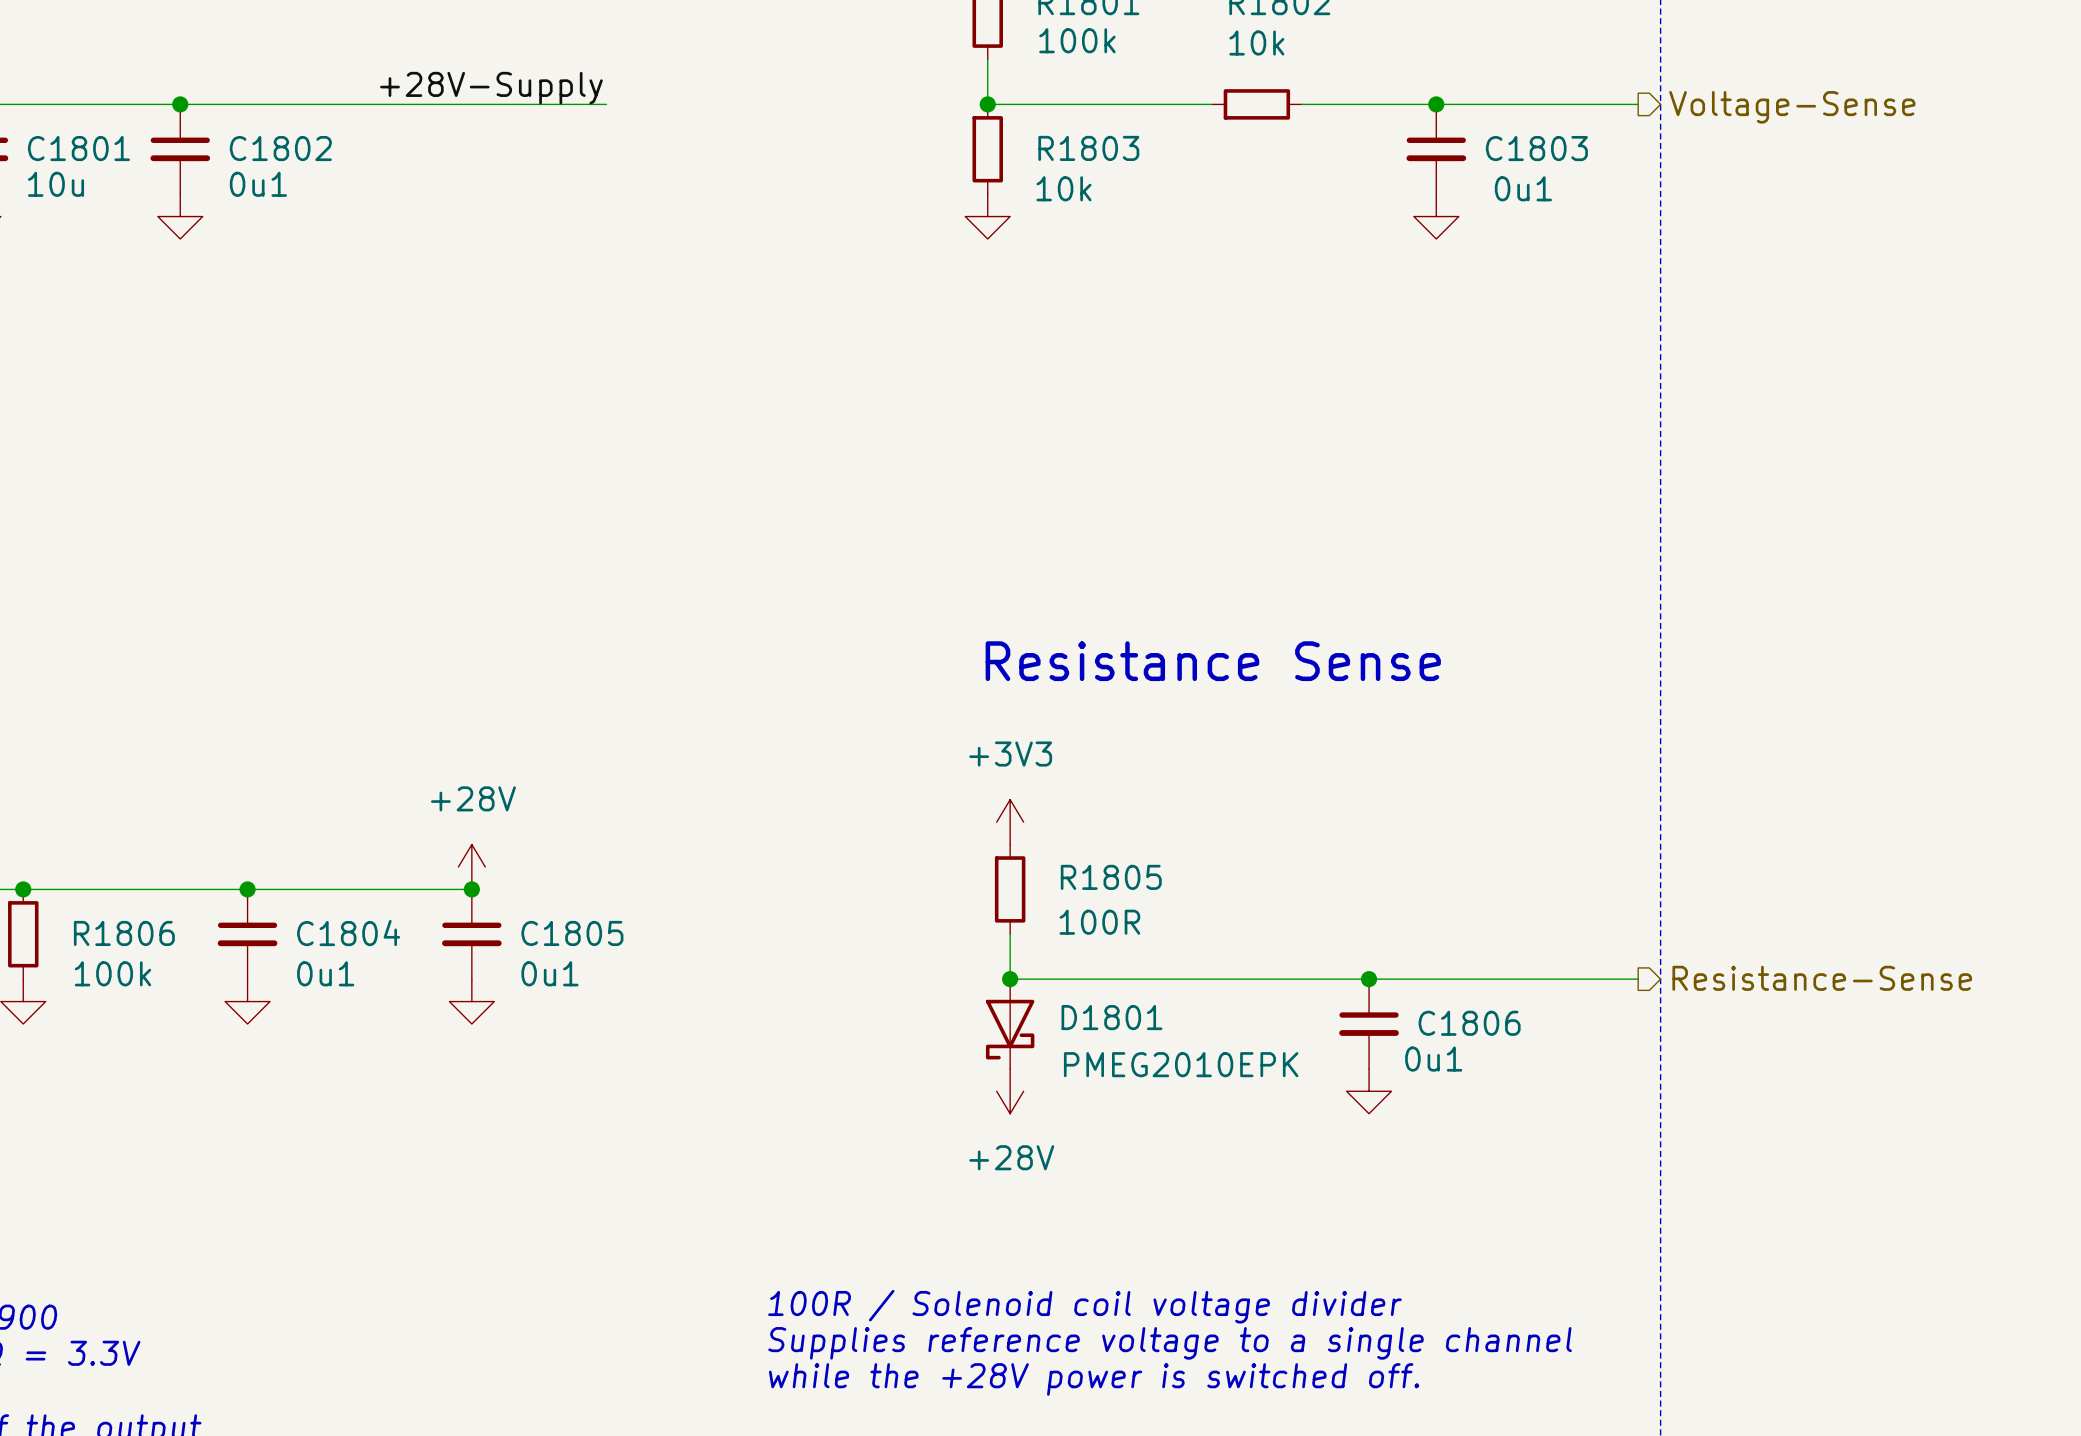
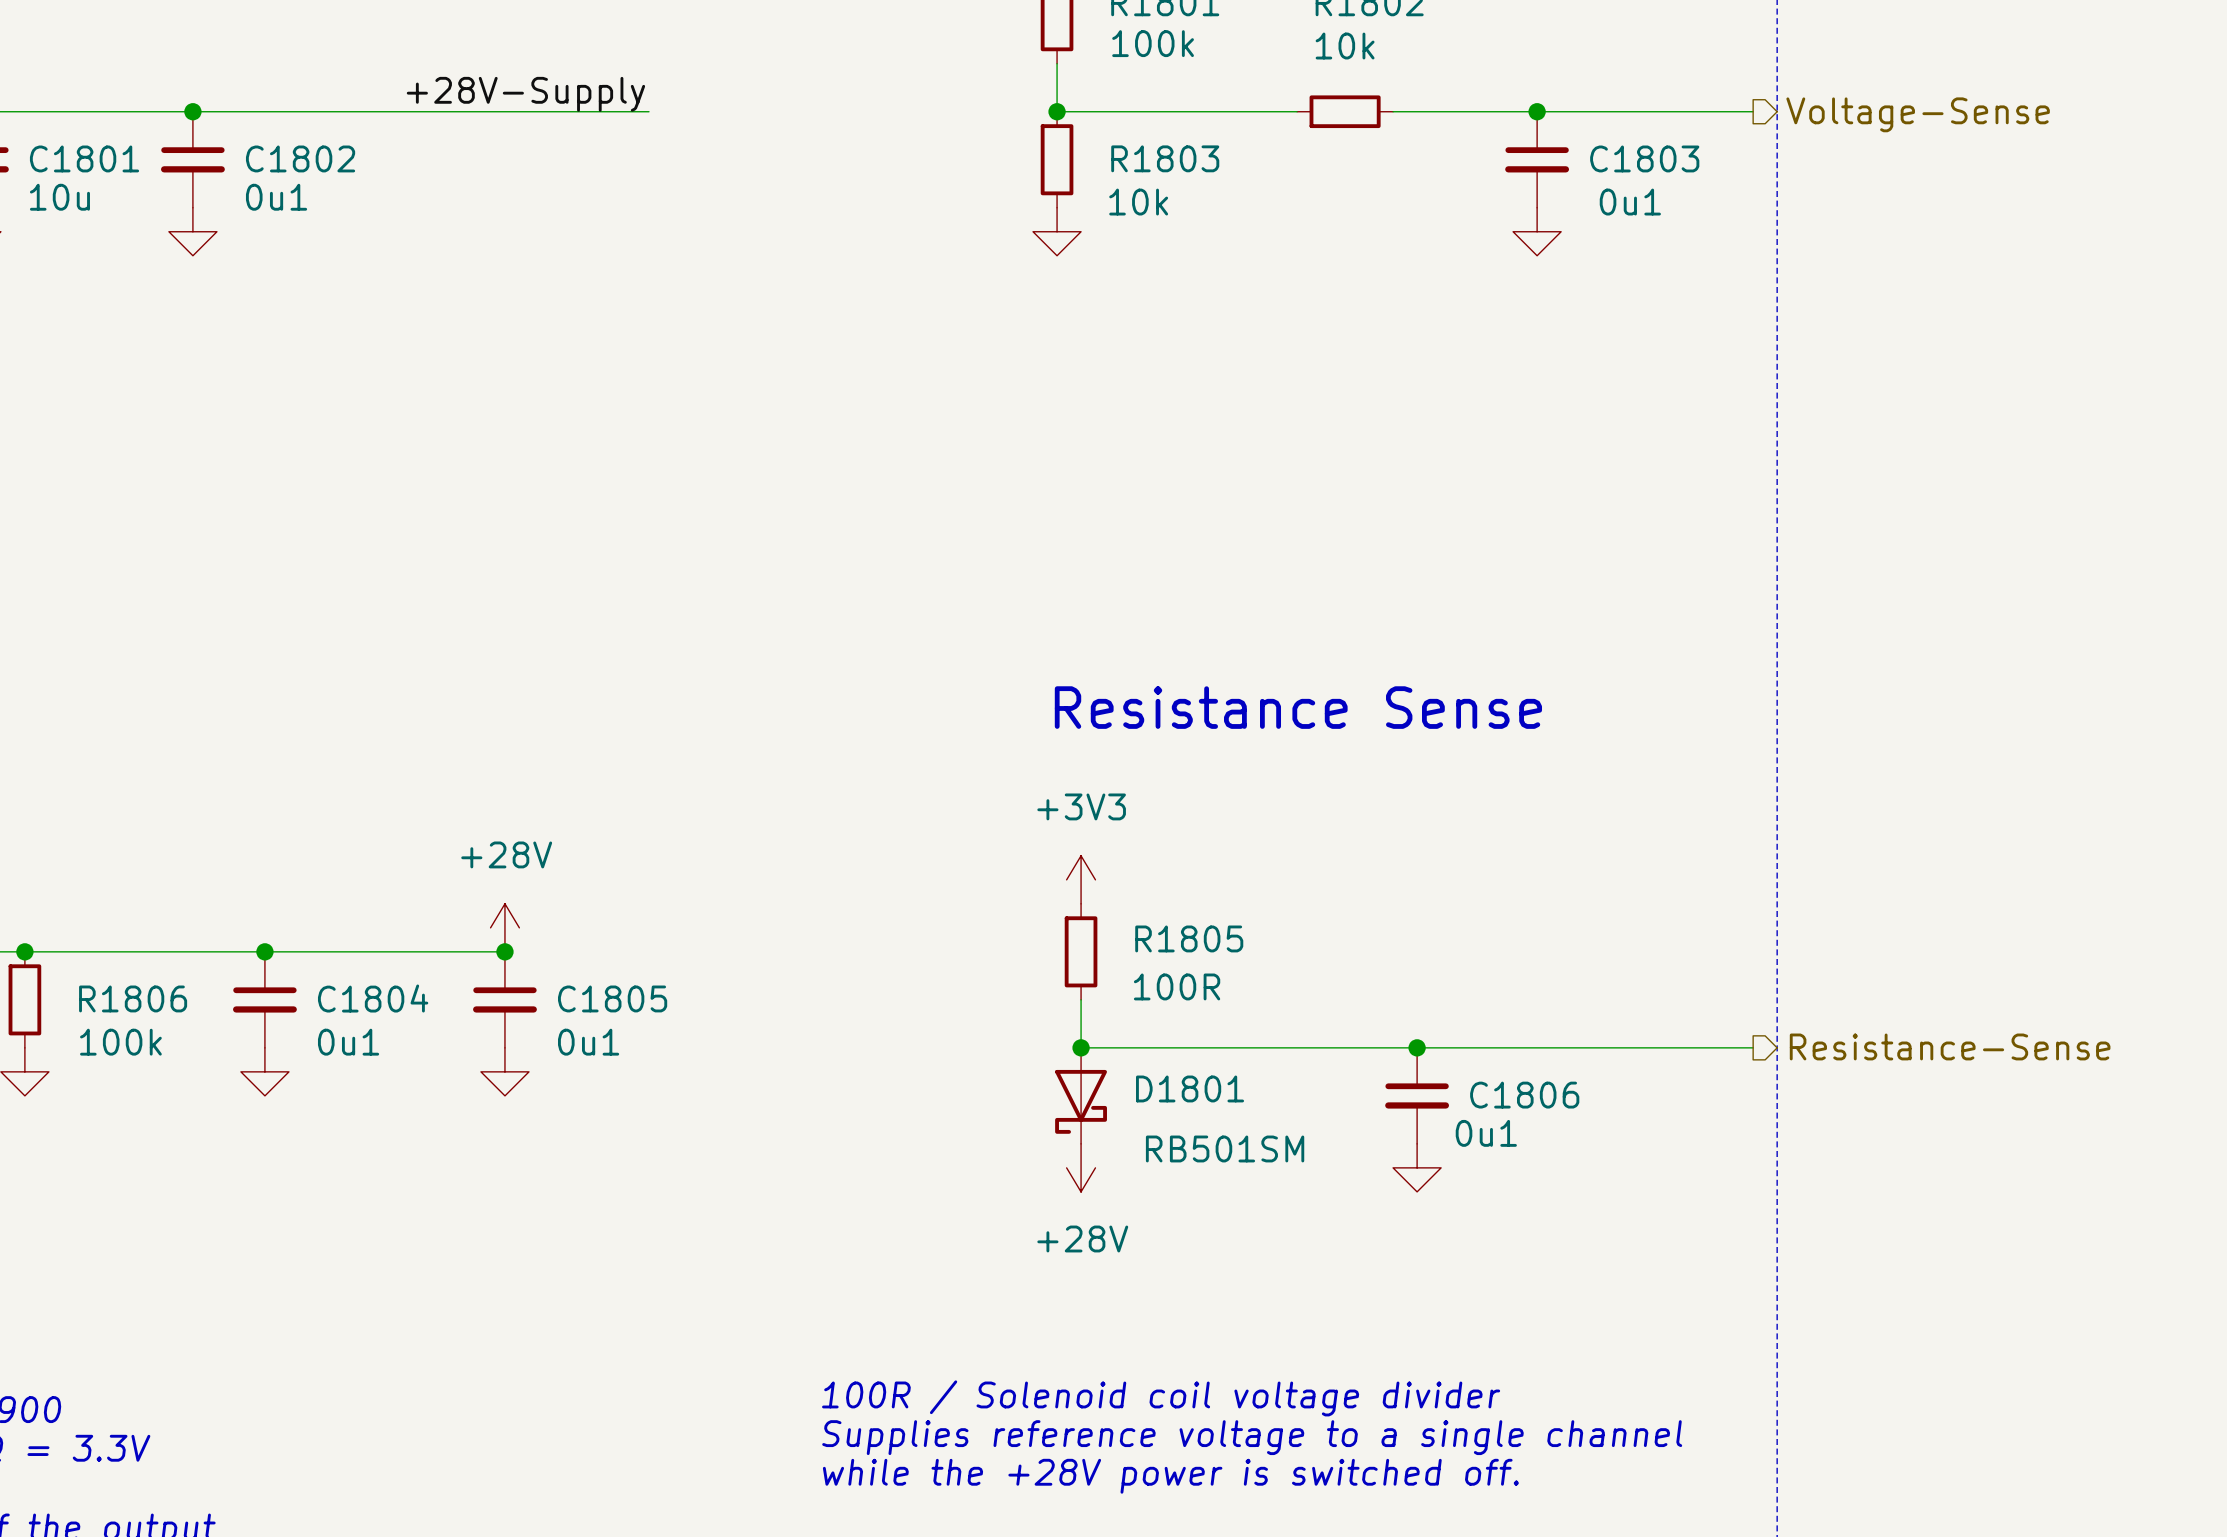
junction position: (1369, 979) -> (1417, 1047)
C1806 position: (1369, 1024) -> (1417, 1095)
D1801 value: PMEG2010EPK (1181, 1064) -> RB501SM (1225, 1148)
power symbol position: (1369, 1091) -> (1417, 1167)

